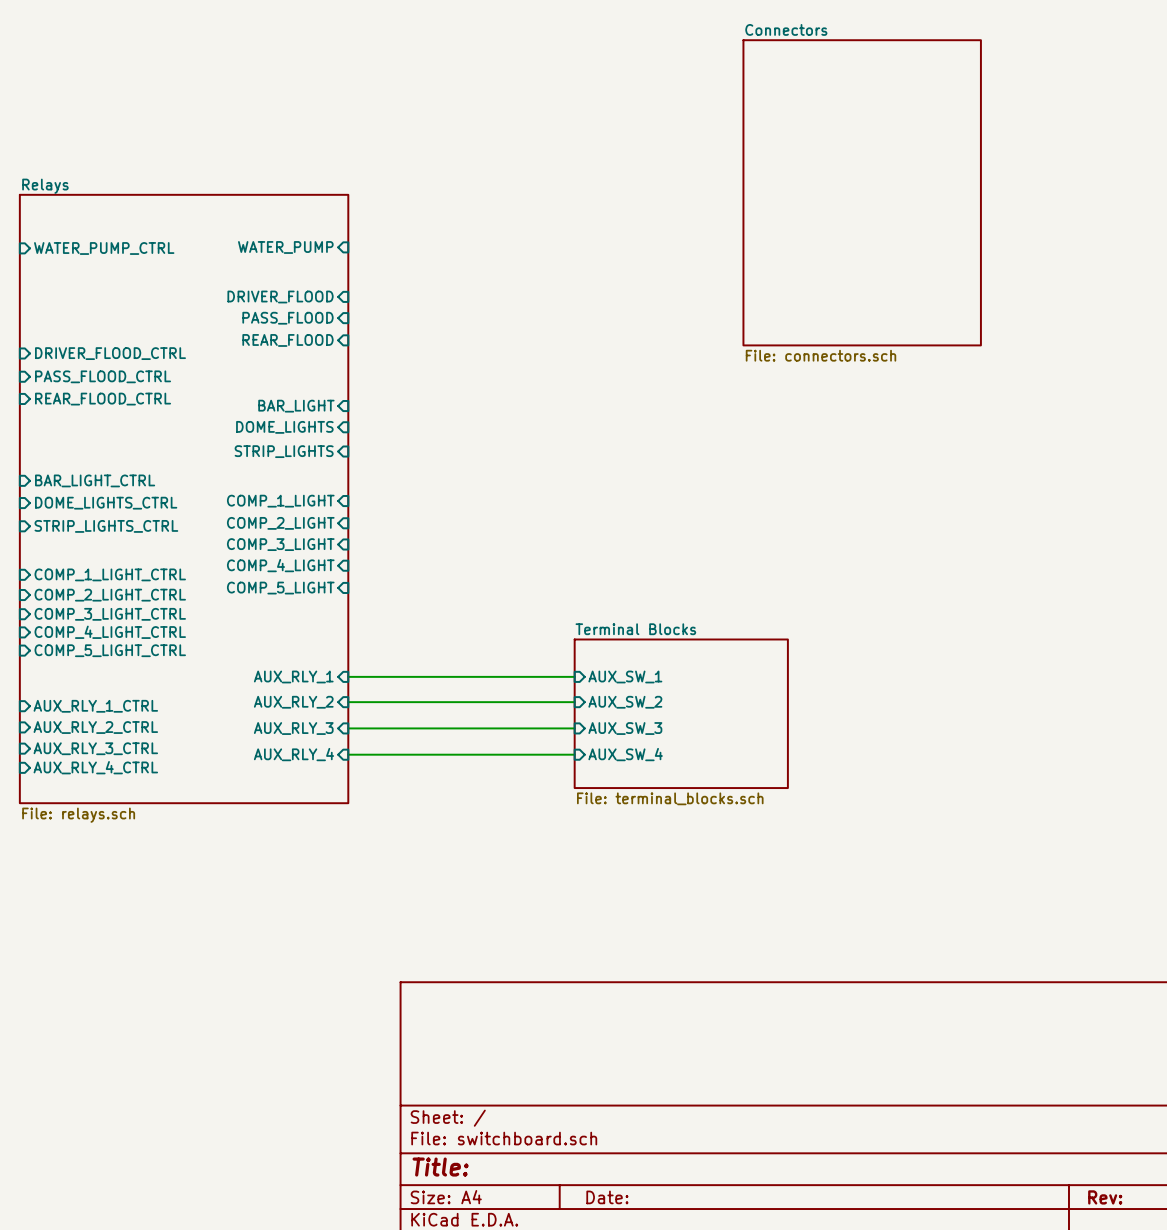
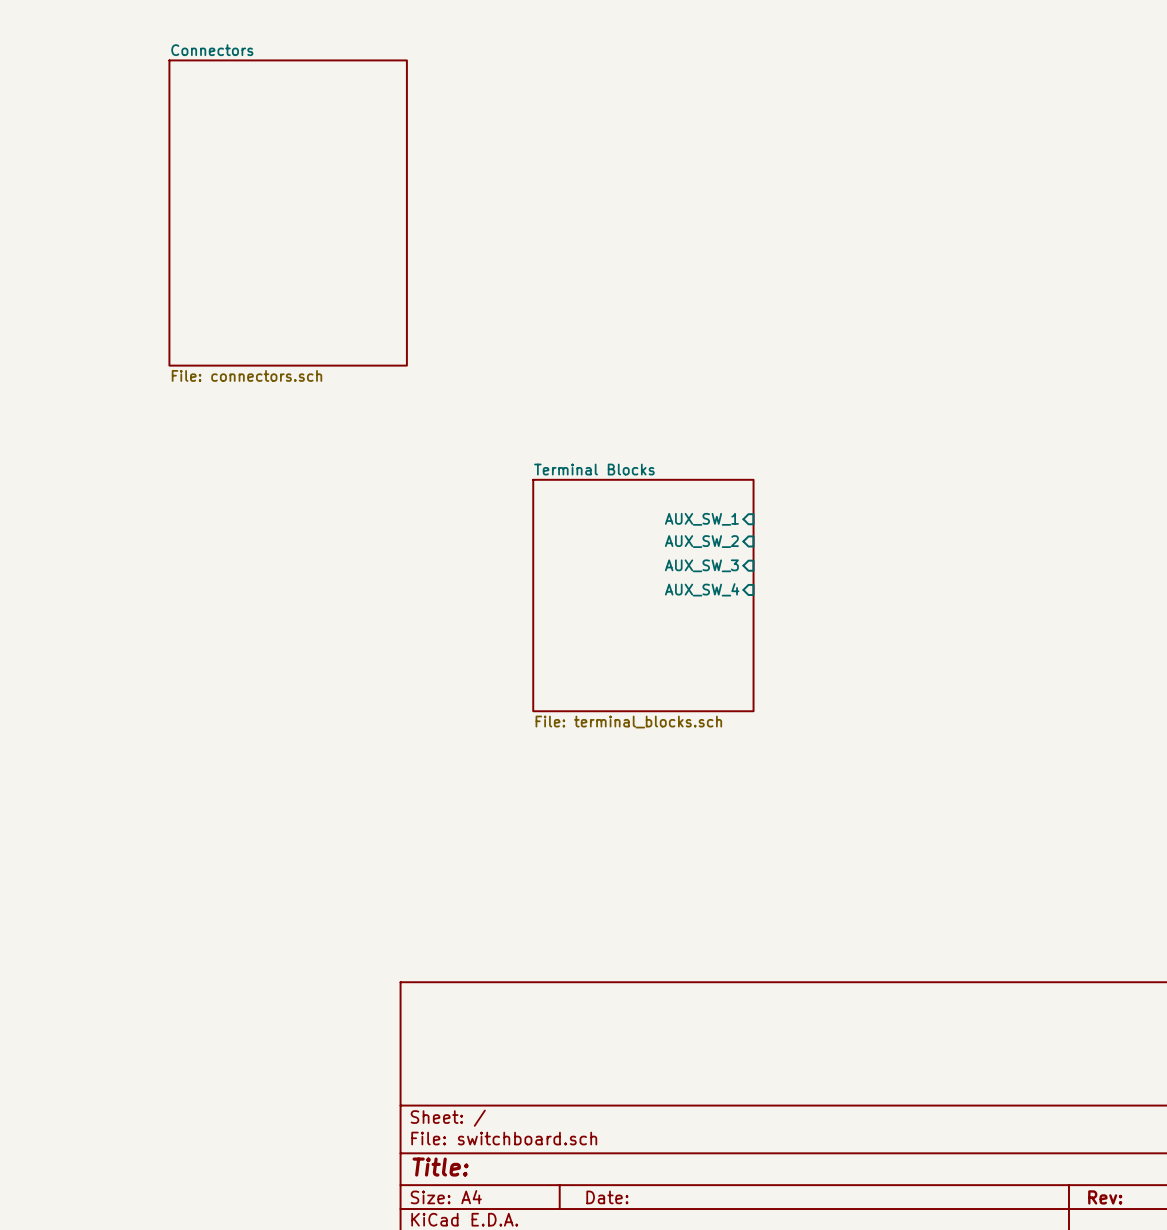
sheet Connectors: File: connectors.sch (862, 192) -> none
sheet Connectors: none -> File: connectors.sch (288, 213)
sheet pin: WATER_PUMP (285, 247) -> none
sheet pin: WATER_PUMP_CTRL (104, 248) -> none
sheet pin: DRIVER_FLOOD (280, 297) -> none
sheet pin: PASS_FLOOD (287, 318) -> none
sheet pin: REAR_FLOOD (287, 340) -> none
sheet pin: DRIVER_FLOOD_CTRL (110, 353) -> none
sheet pin: PASS_FLOOD_CTRL (103, 376) -> none
sheet pin: REAR_FLOOD_CTRL (103, 399) -> none
sheet pin: BAR_LIGHT (296, 406) -> none
sheet pin: DOME_LIGHTS (284, 427) -> none
sheet pin: STRIP_LIGHTS (284, 451) -> none
sheet pin: BAR_LIGHT_CTRL (95, 480) -> none
sheet Relays: File: relays.sch (184, 499) -> none
sheet pin: COMP_1_LIGHT (280, 501) -> none
sheet pin: DOME_LIGHTS_CTRL (106, 503) -> none
sheet pin: none -> AUX_SW_1 (701, 519)
sheet pin: COMP_2_LIGHT (280, 523) -> none
sheet pin: STRIP_LIGHTS_CTRL (106, 526) -> none
sheet pin: none -> AUX_SW_2 (701, 541)
sheet pin: COMP_3_LIGHT (280, 544) -> none
sheet pin: COMP_4_LIGHT (280, 565) -> none
sheet pin: none -> AUX_SW_3 (701, 565)
sheet pin: COMP_1_LIGHT_CTRL (110, 574) -> none
sheet pin: COMP_5_LIGHT (280, 588) -> none
sheet pin: none -> AUX_SW_4 (702, 589)
sheet pin: COMP_2_LIGHT_CTRL (110, 595) -> none
sheet Terminal Blocks: none -> File: terminal_blocks.sch (643, 595)
sheet pin: COMP_3_LIGHT_CTRL (110, 614) -> none
sheet pin: COMP_4_LIGHT_CTRL (110, 632) -> none
sheet pin: COMP_5_LIGHT_CTRL (110, 650) -> none
sheet pin: AUX_RLY_1 (293, 676) -> none
wire: (348, 676) (574, 676) -> none
sheet pin: AUX_SW_1 (625, 676) -> none
sheet pin: AUX_RLY_2 (293, 702) -> none
wire: (348, 702) (574, 702) -> none
sheet pin: AUX_SW_2 (625, 702) -> none
sheet pin: AUX_RLY_1_CTRL (95, 706) -> none
sheet Terminal Blocks: File: terminal_blocks.sch (681, 713) -> none
sheet pin: AUX_RLY_2_CTRL (95, 727) -> none
sheet pin: AUX_RLY_3 (293, 728) -> none
wire: (348, 728) (574, 728) -> none
sheet pin: AUX_SW_3 (625, 728) -> none
sheet pin: AUX_RLY_3_CTRL (95, 748) -> none
sheet pin: AUX_RLY_4 (294, 754) -> none
wire: (348, 754) (574, 754) -> none
sheet pin: AUX_SW_4 (625, 754) -> none
sheet pin: AUX_RLY_4_CTRL (95, 767) -> none

